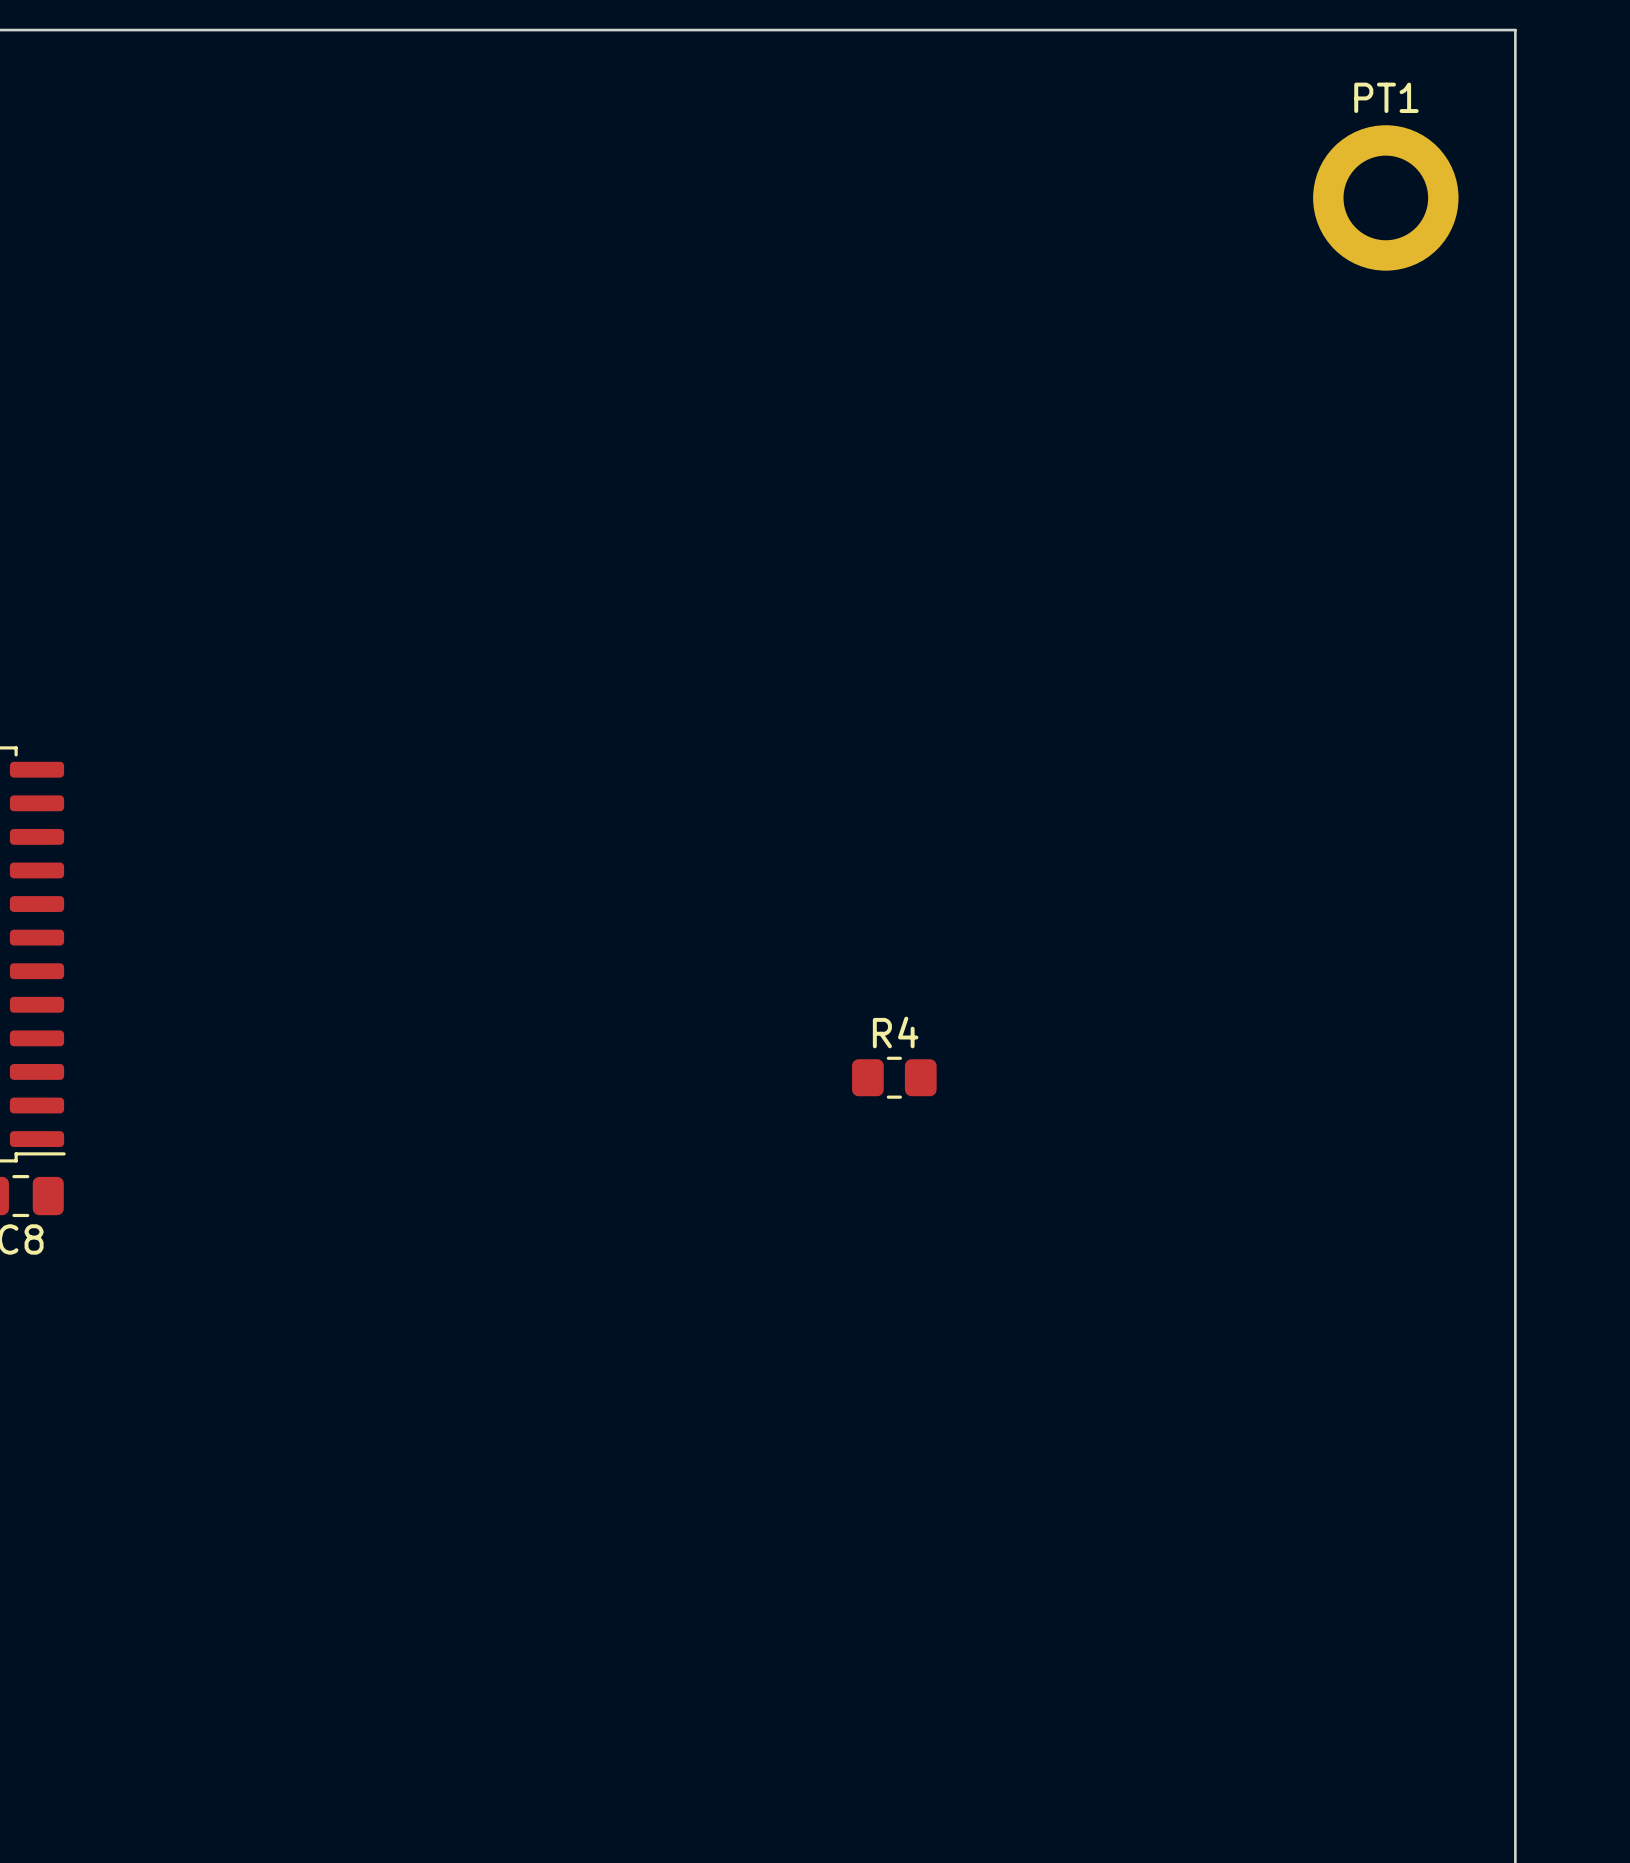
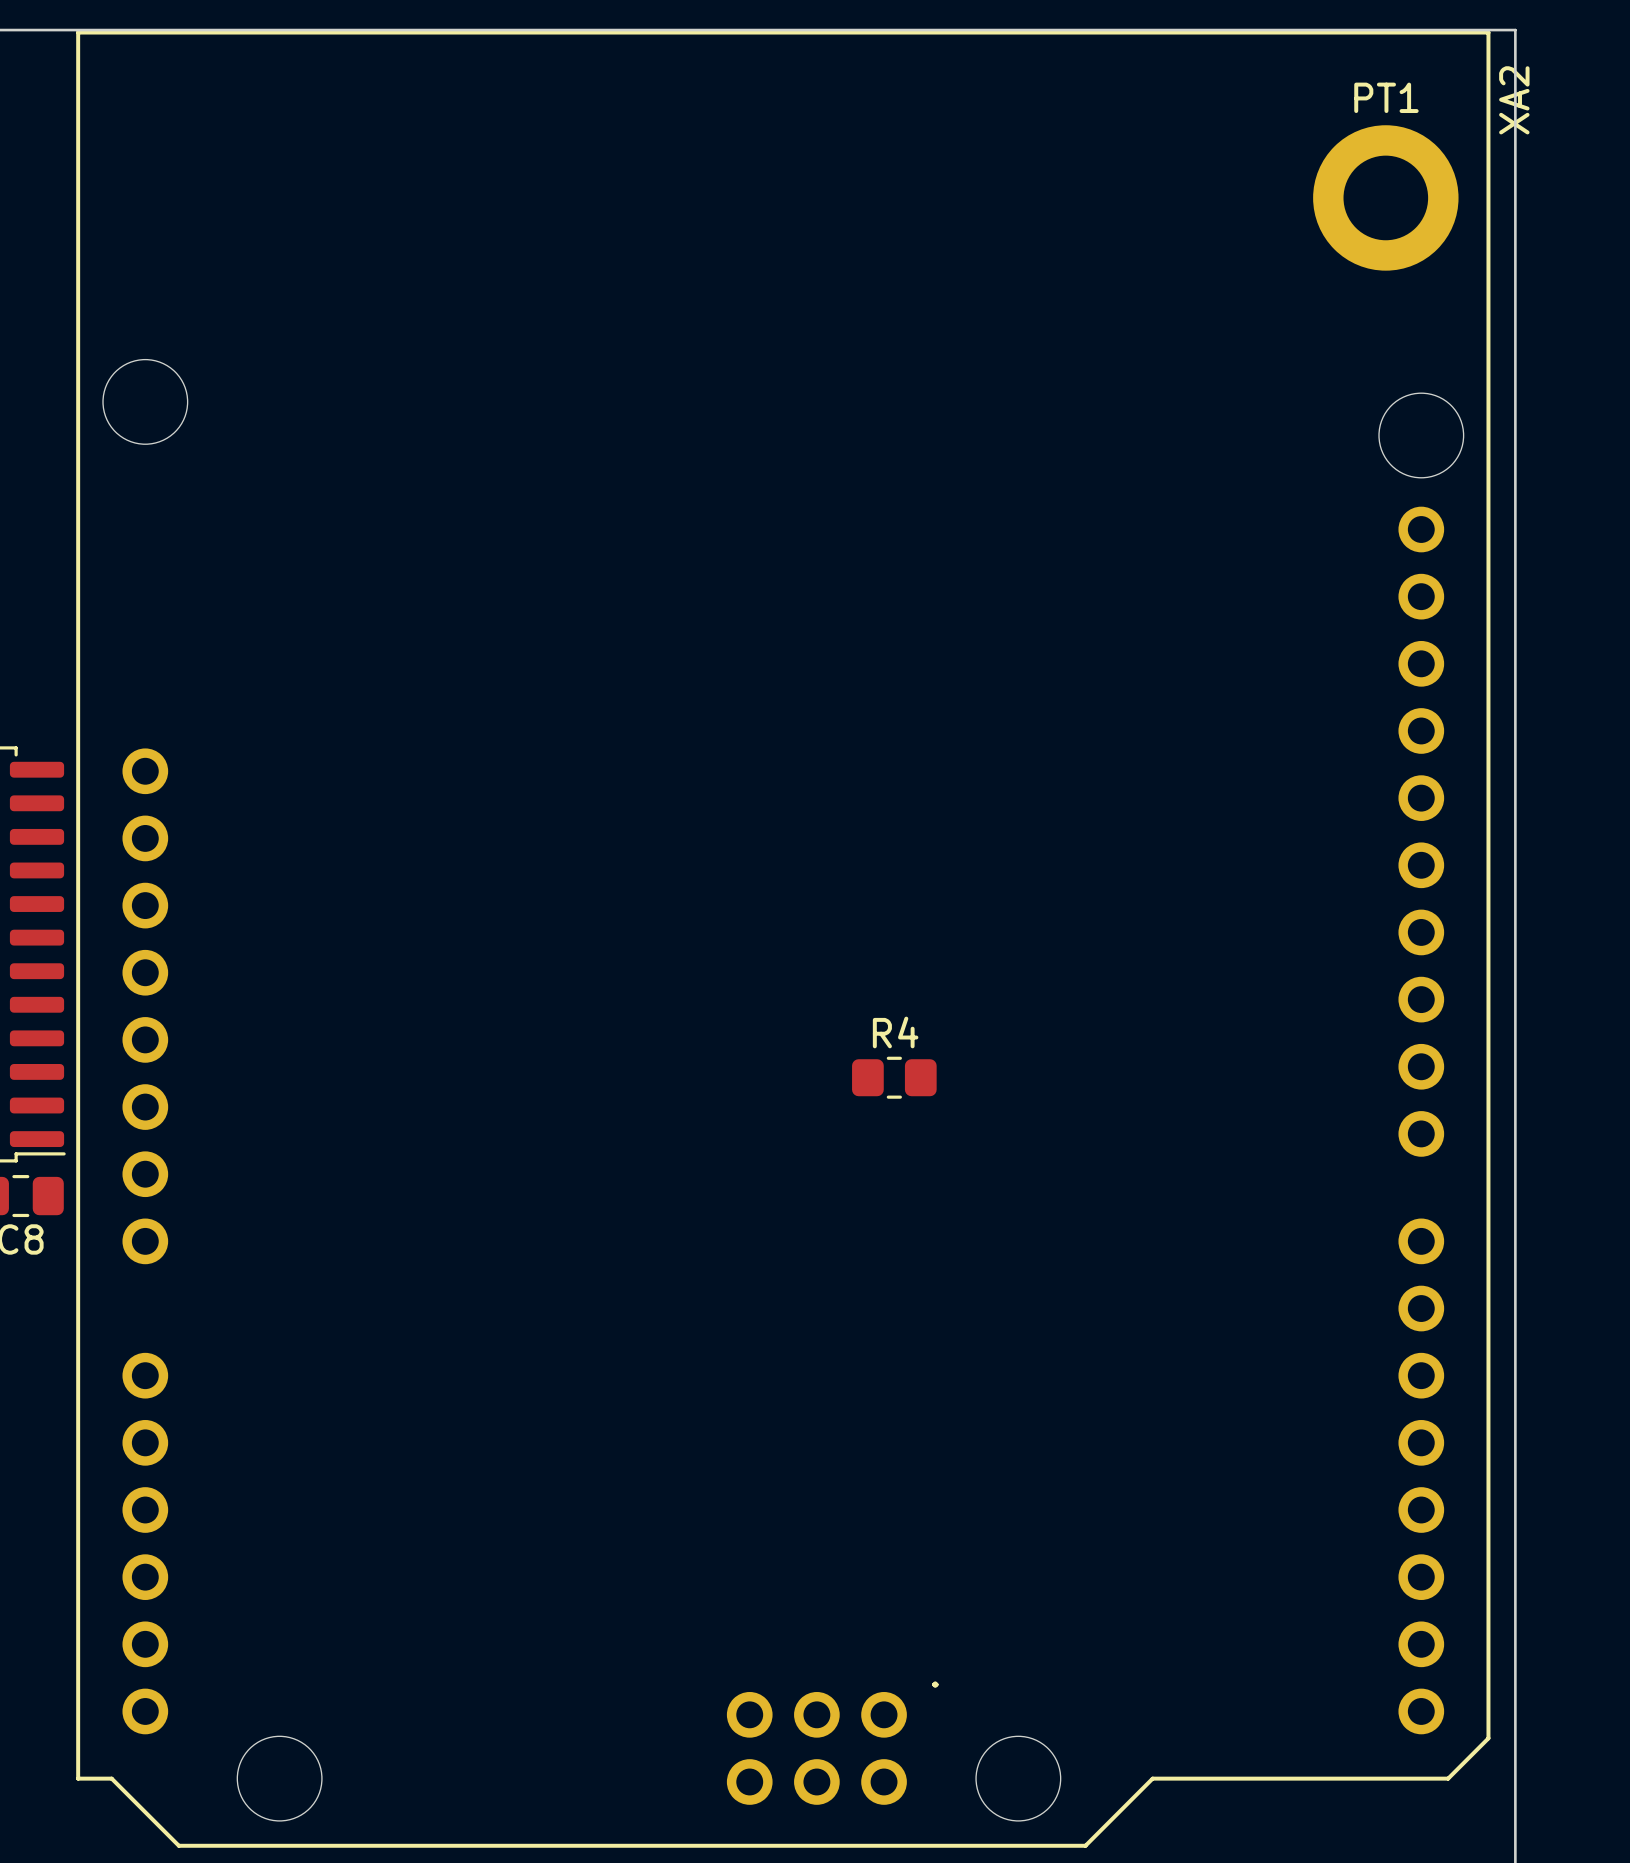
XA2: none -> (783, 939)

